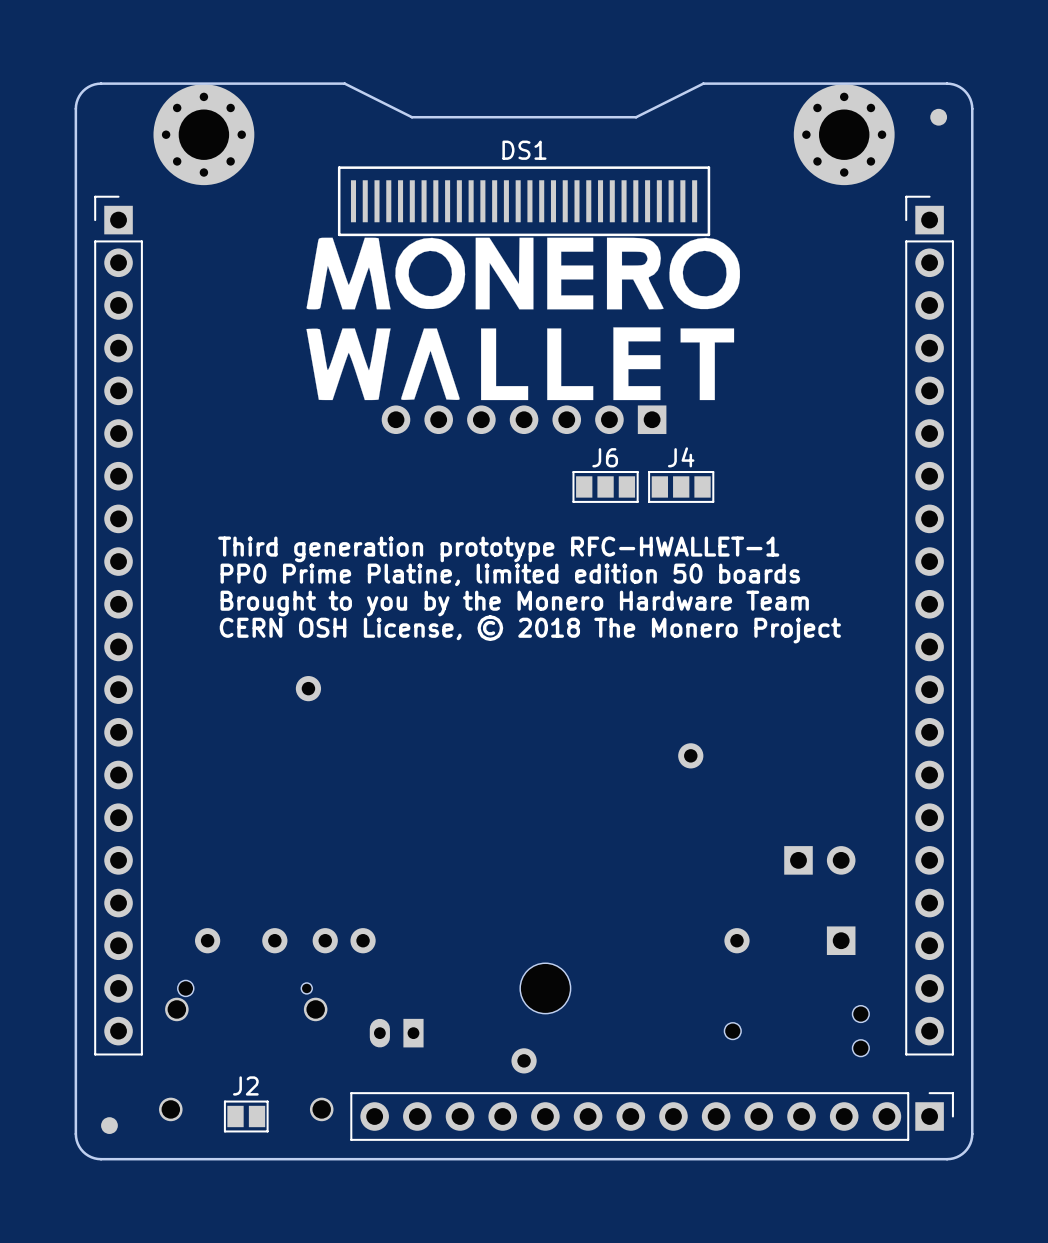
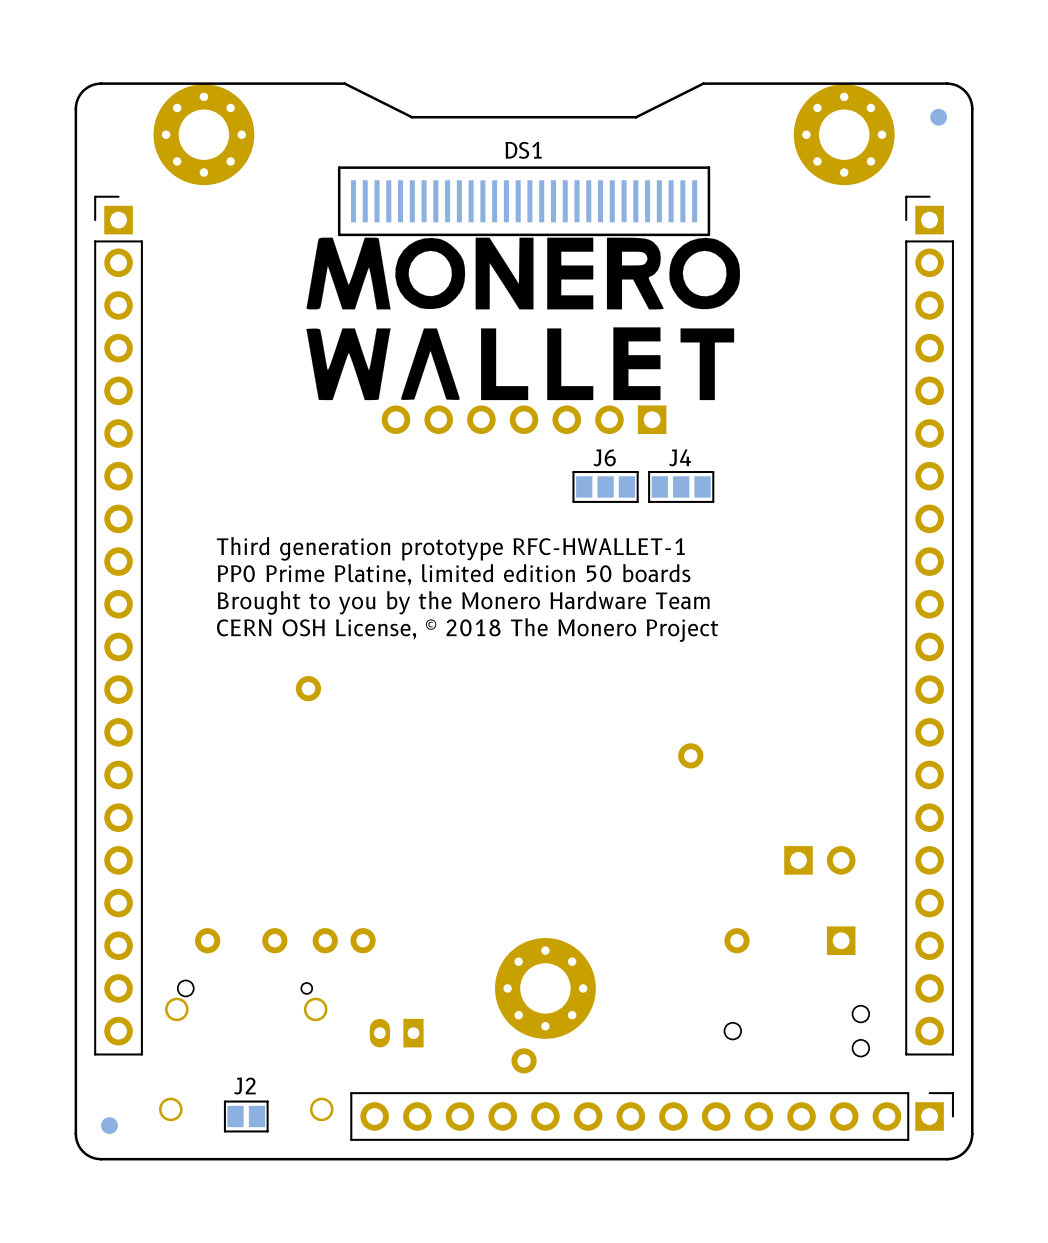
part footprint: [520, 963, 571, 1014] -> [494, 938, 596, 1039]

